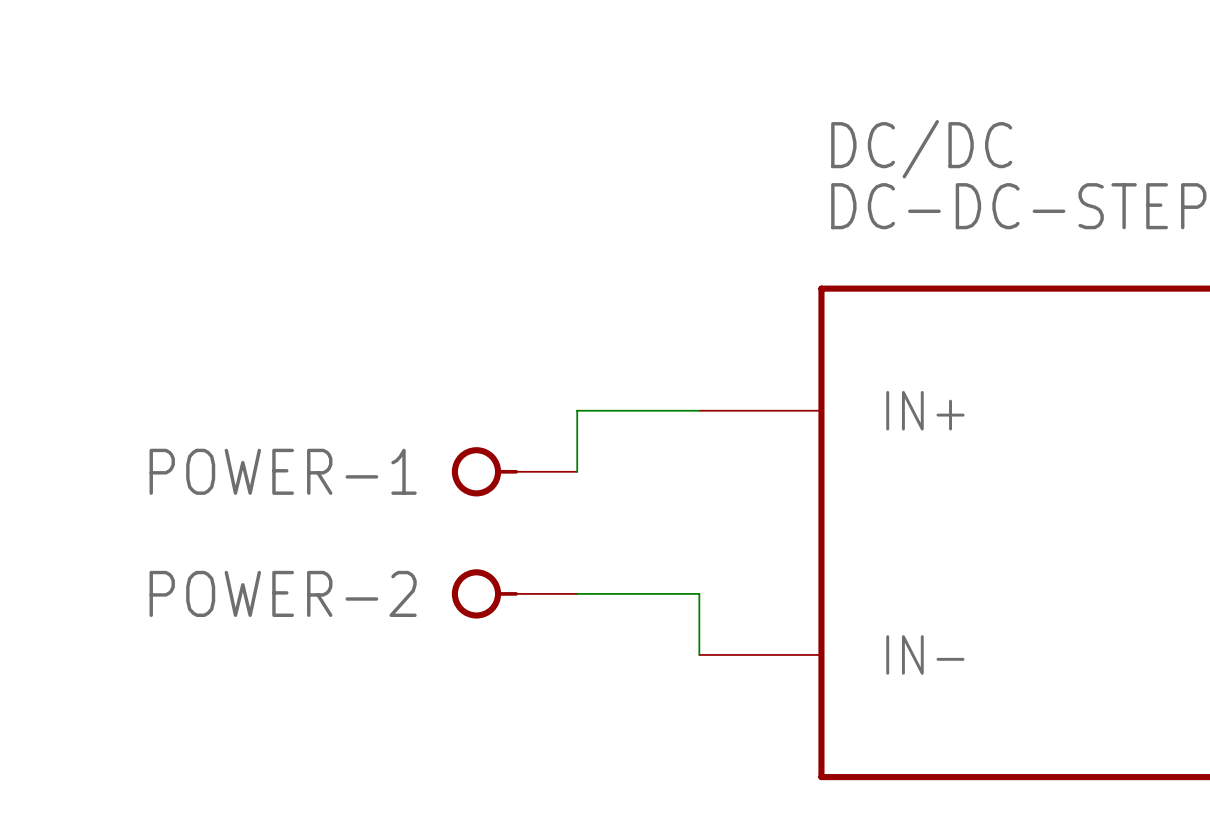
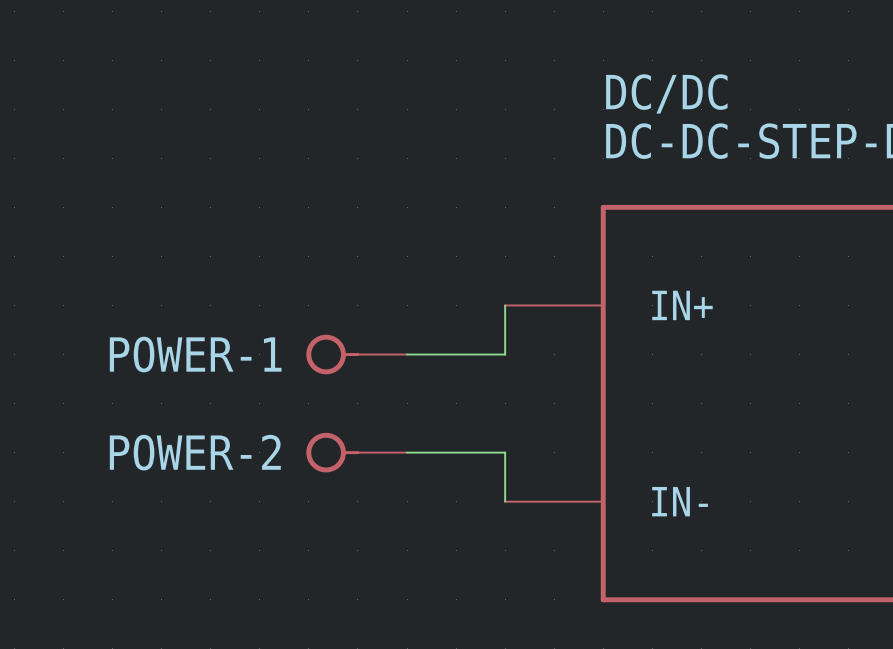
wire: (699, 410) (577, 410) (577, 471) -> (505, 305) (505, 354) (407, 354)

